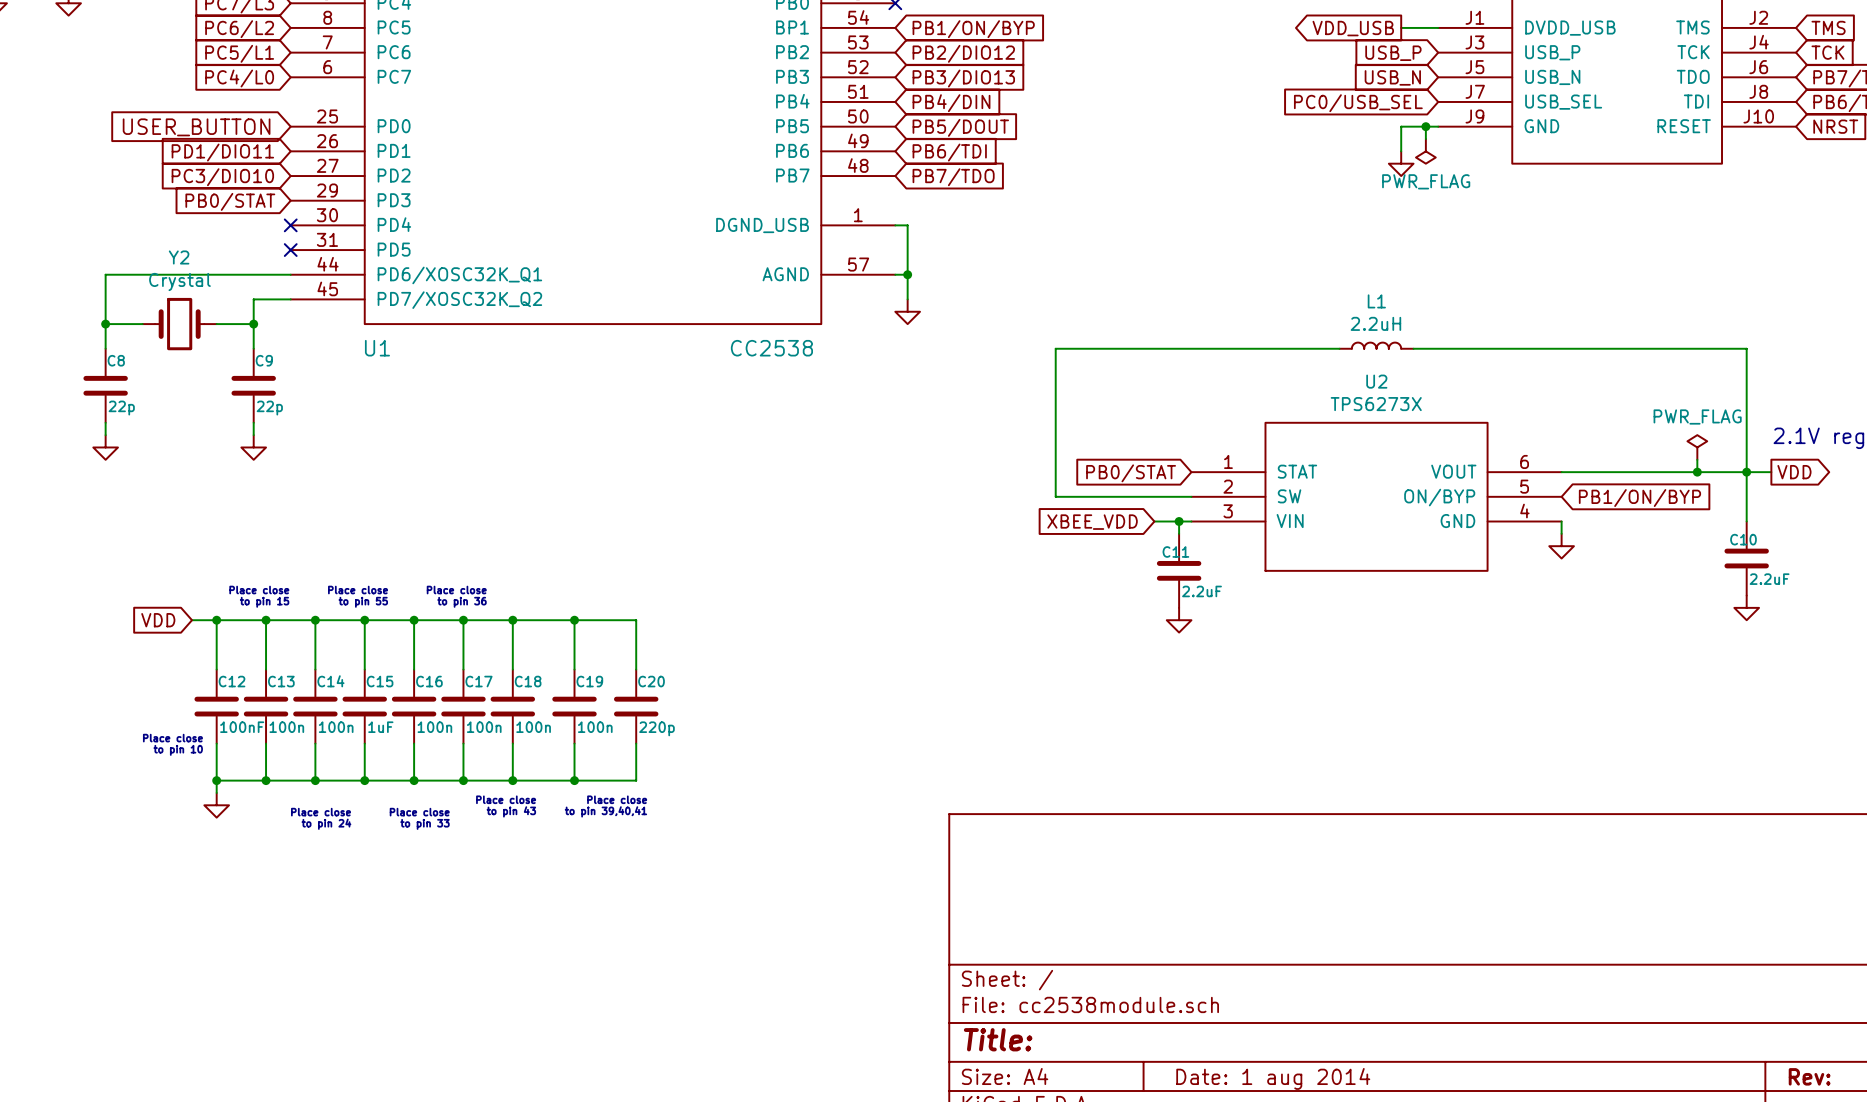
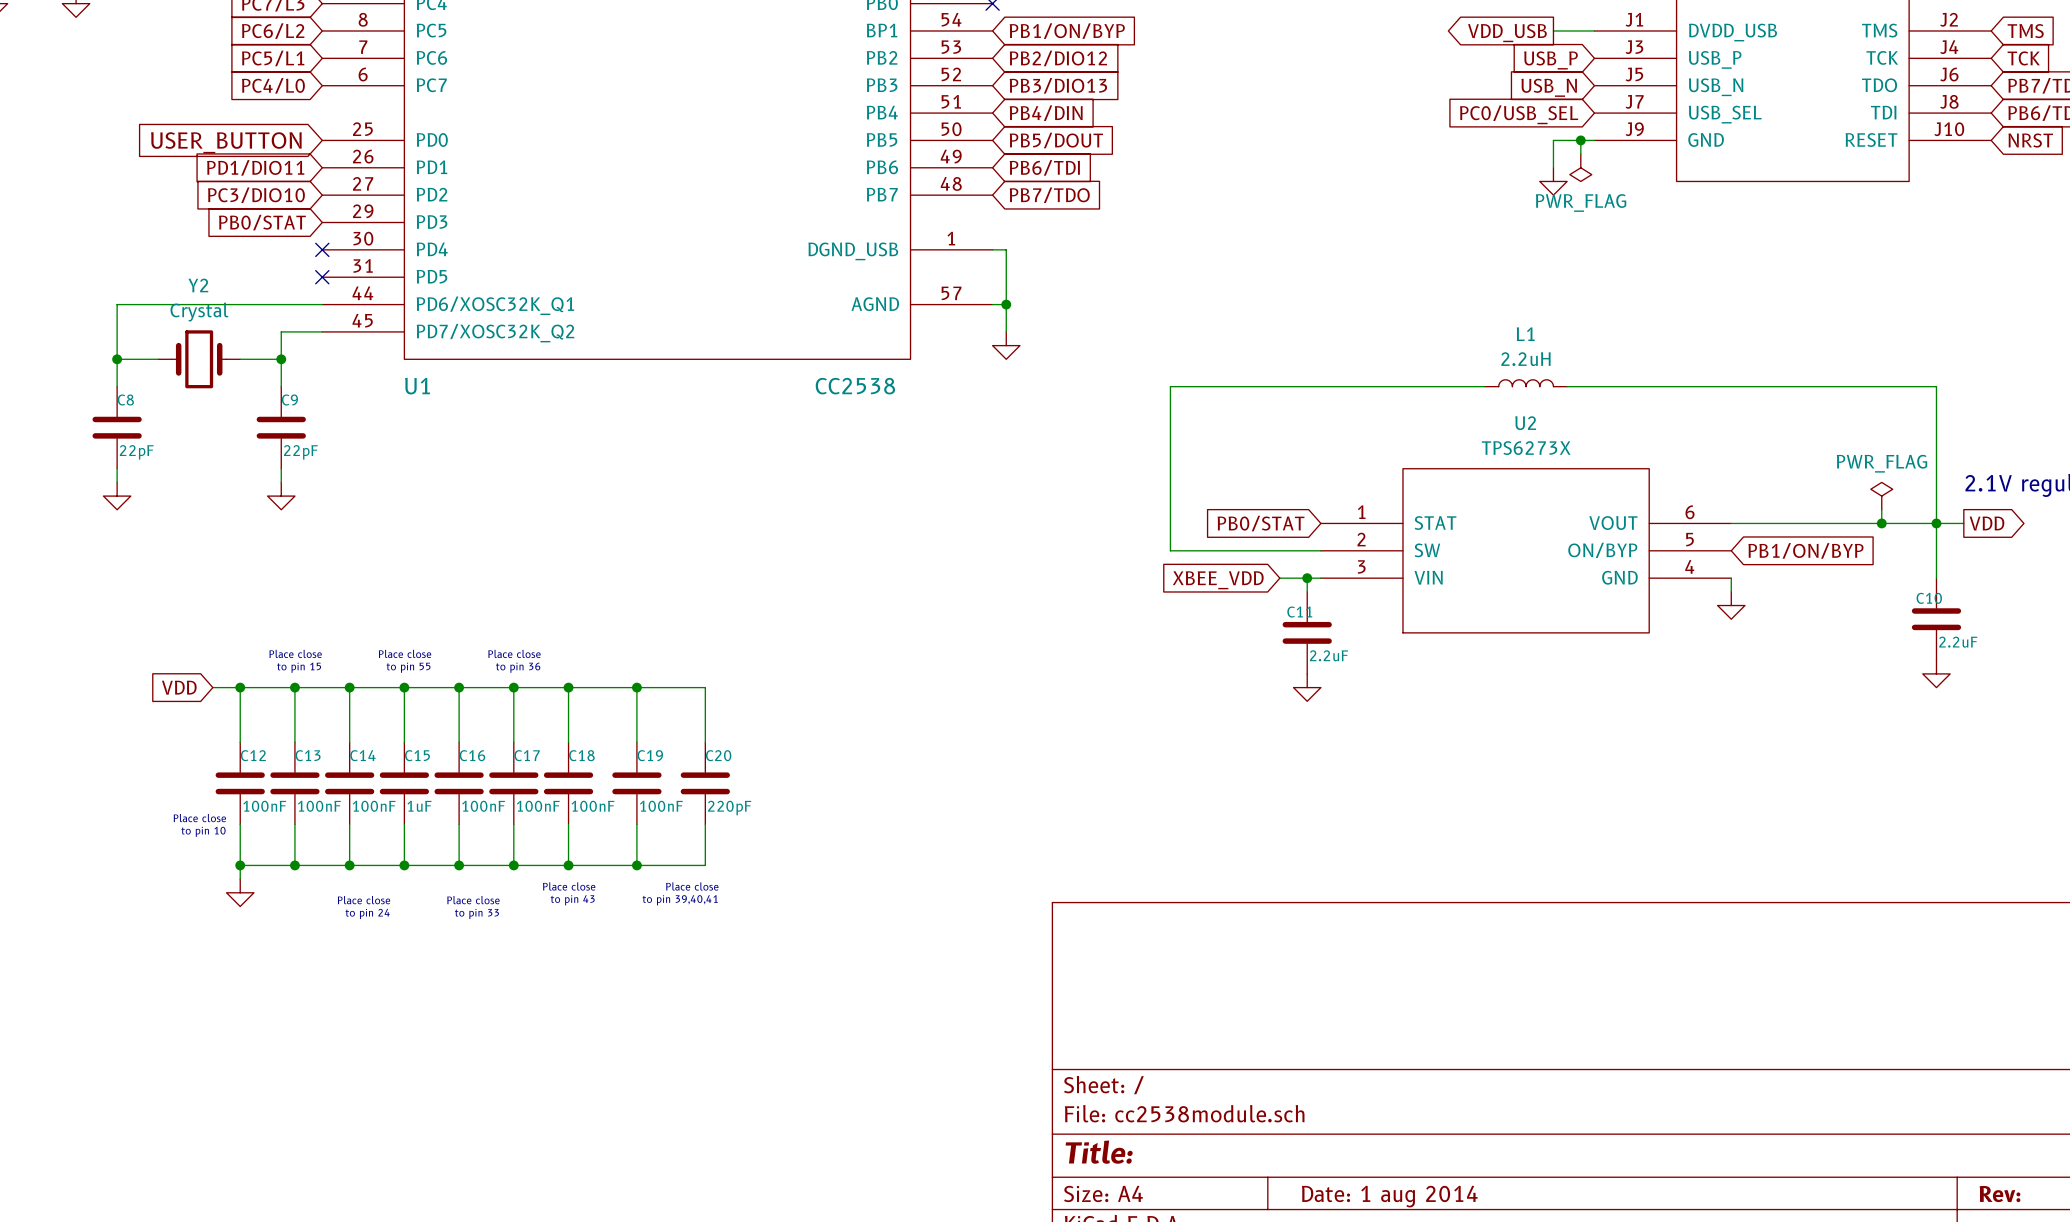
C8 value: 22p (121, 408) -> 22pF (136, 452)
C9 value: 22p (269, 408) -> 22pF (300, 452)
C13 value: 100n (286, 727) -> 100nF (319, 806)
C14 value: 100n (336, 727) -> 100nF (374, 806)
C16 value: 100n (434, 727) -> 100nF (483, 806)
C17 value: 100n (484, 727) -> 100nF (538, 806)
C18 value: 100n (533, 727) -> 100nF (593, 806)
C19 value: 100n (595, 727) -> 100nF (661, 806)
C20 value: 220p (656, 728) -> 220pF (729, 808)

